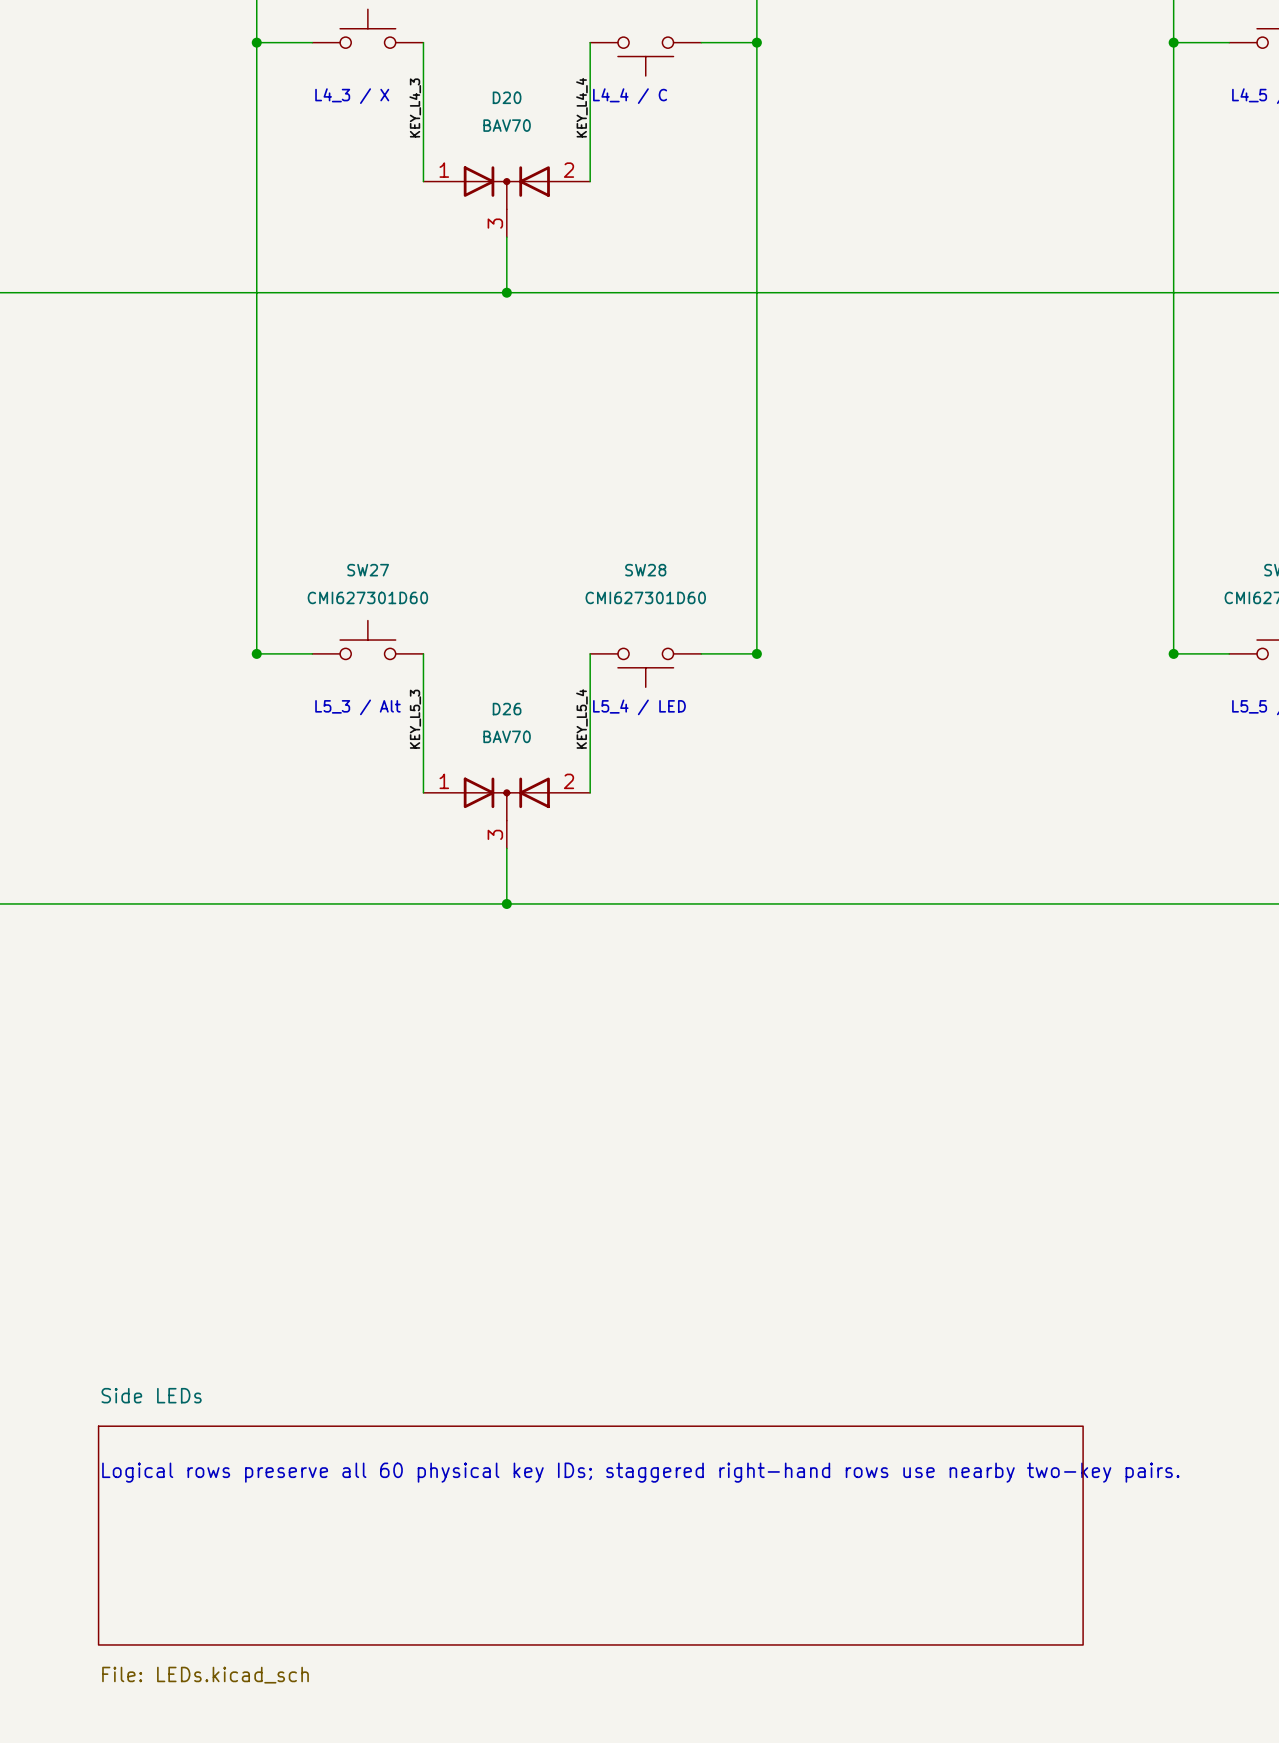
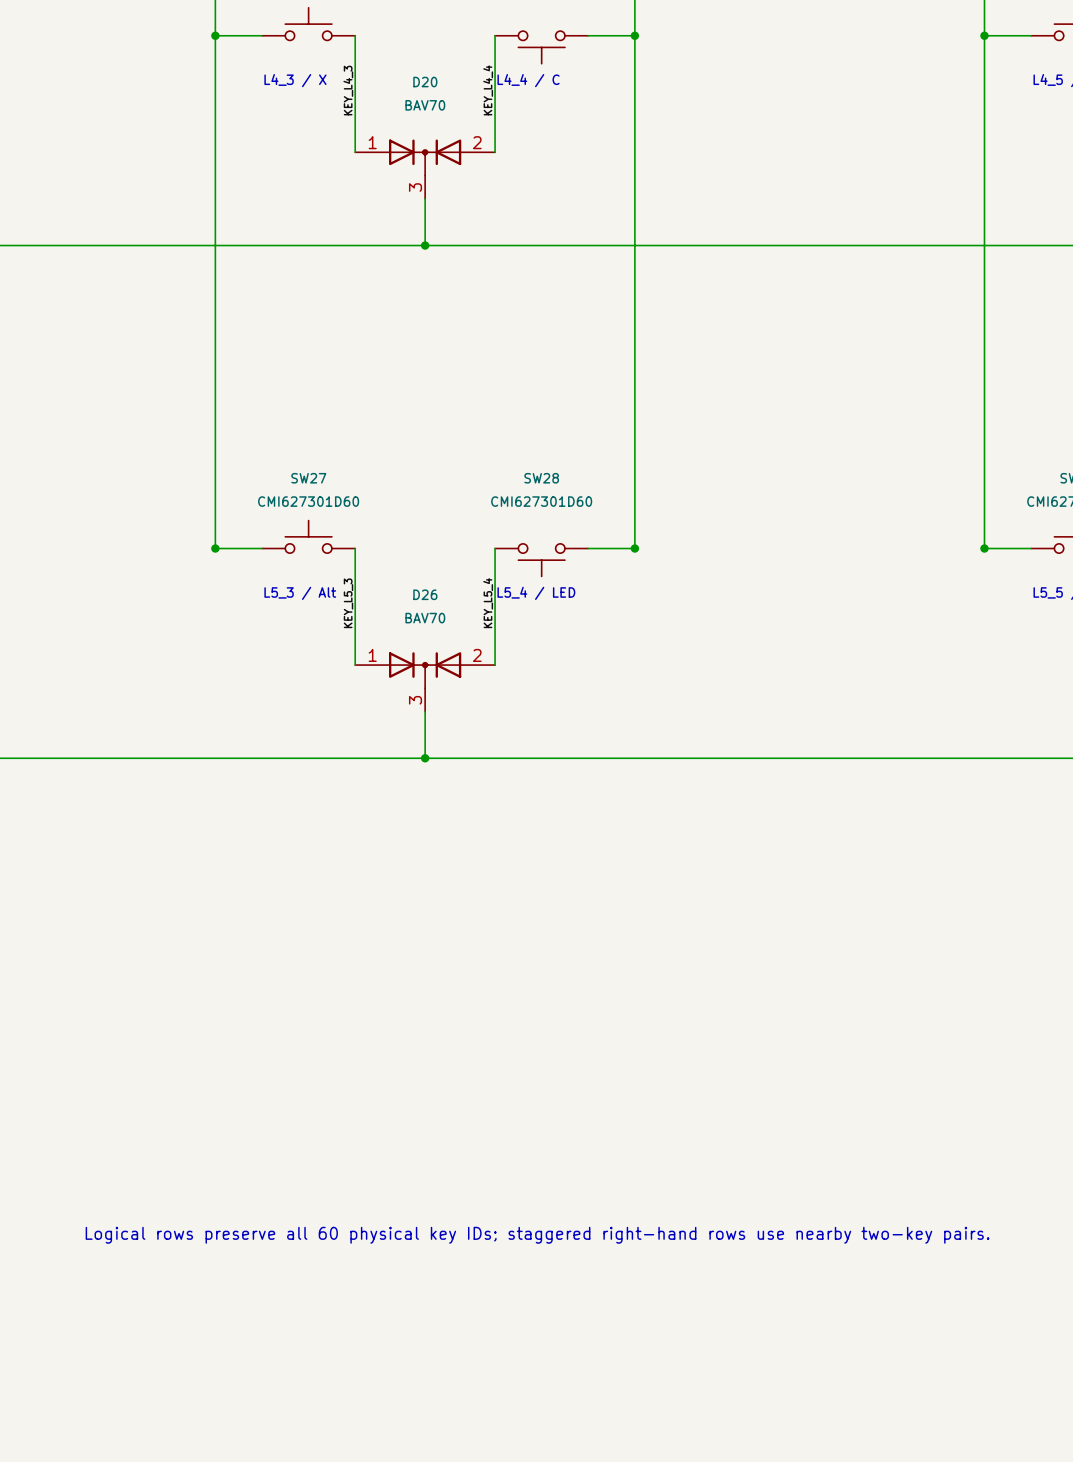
sheet Side LEDs: File: LEDs.kicad_sch (590, 1535) -> none

